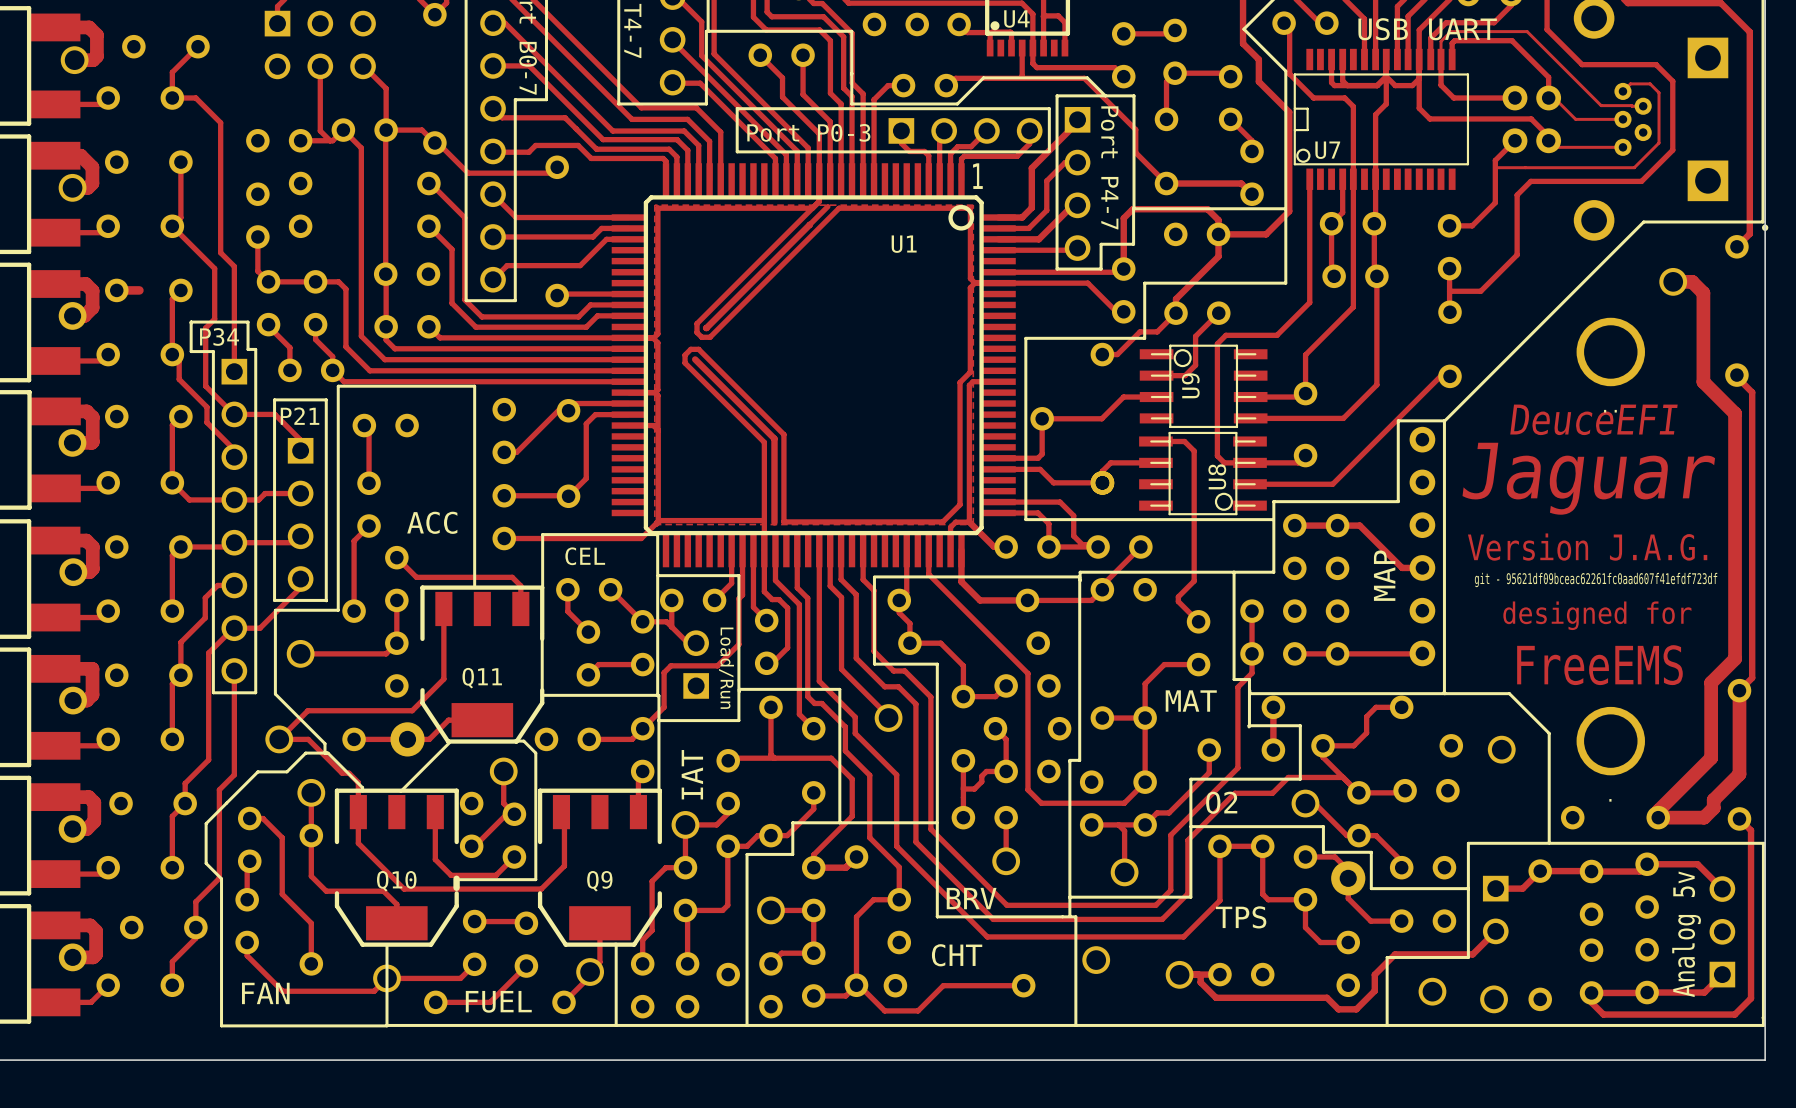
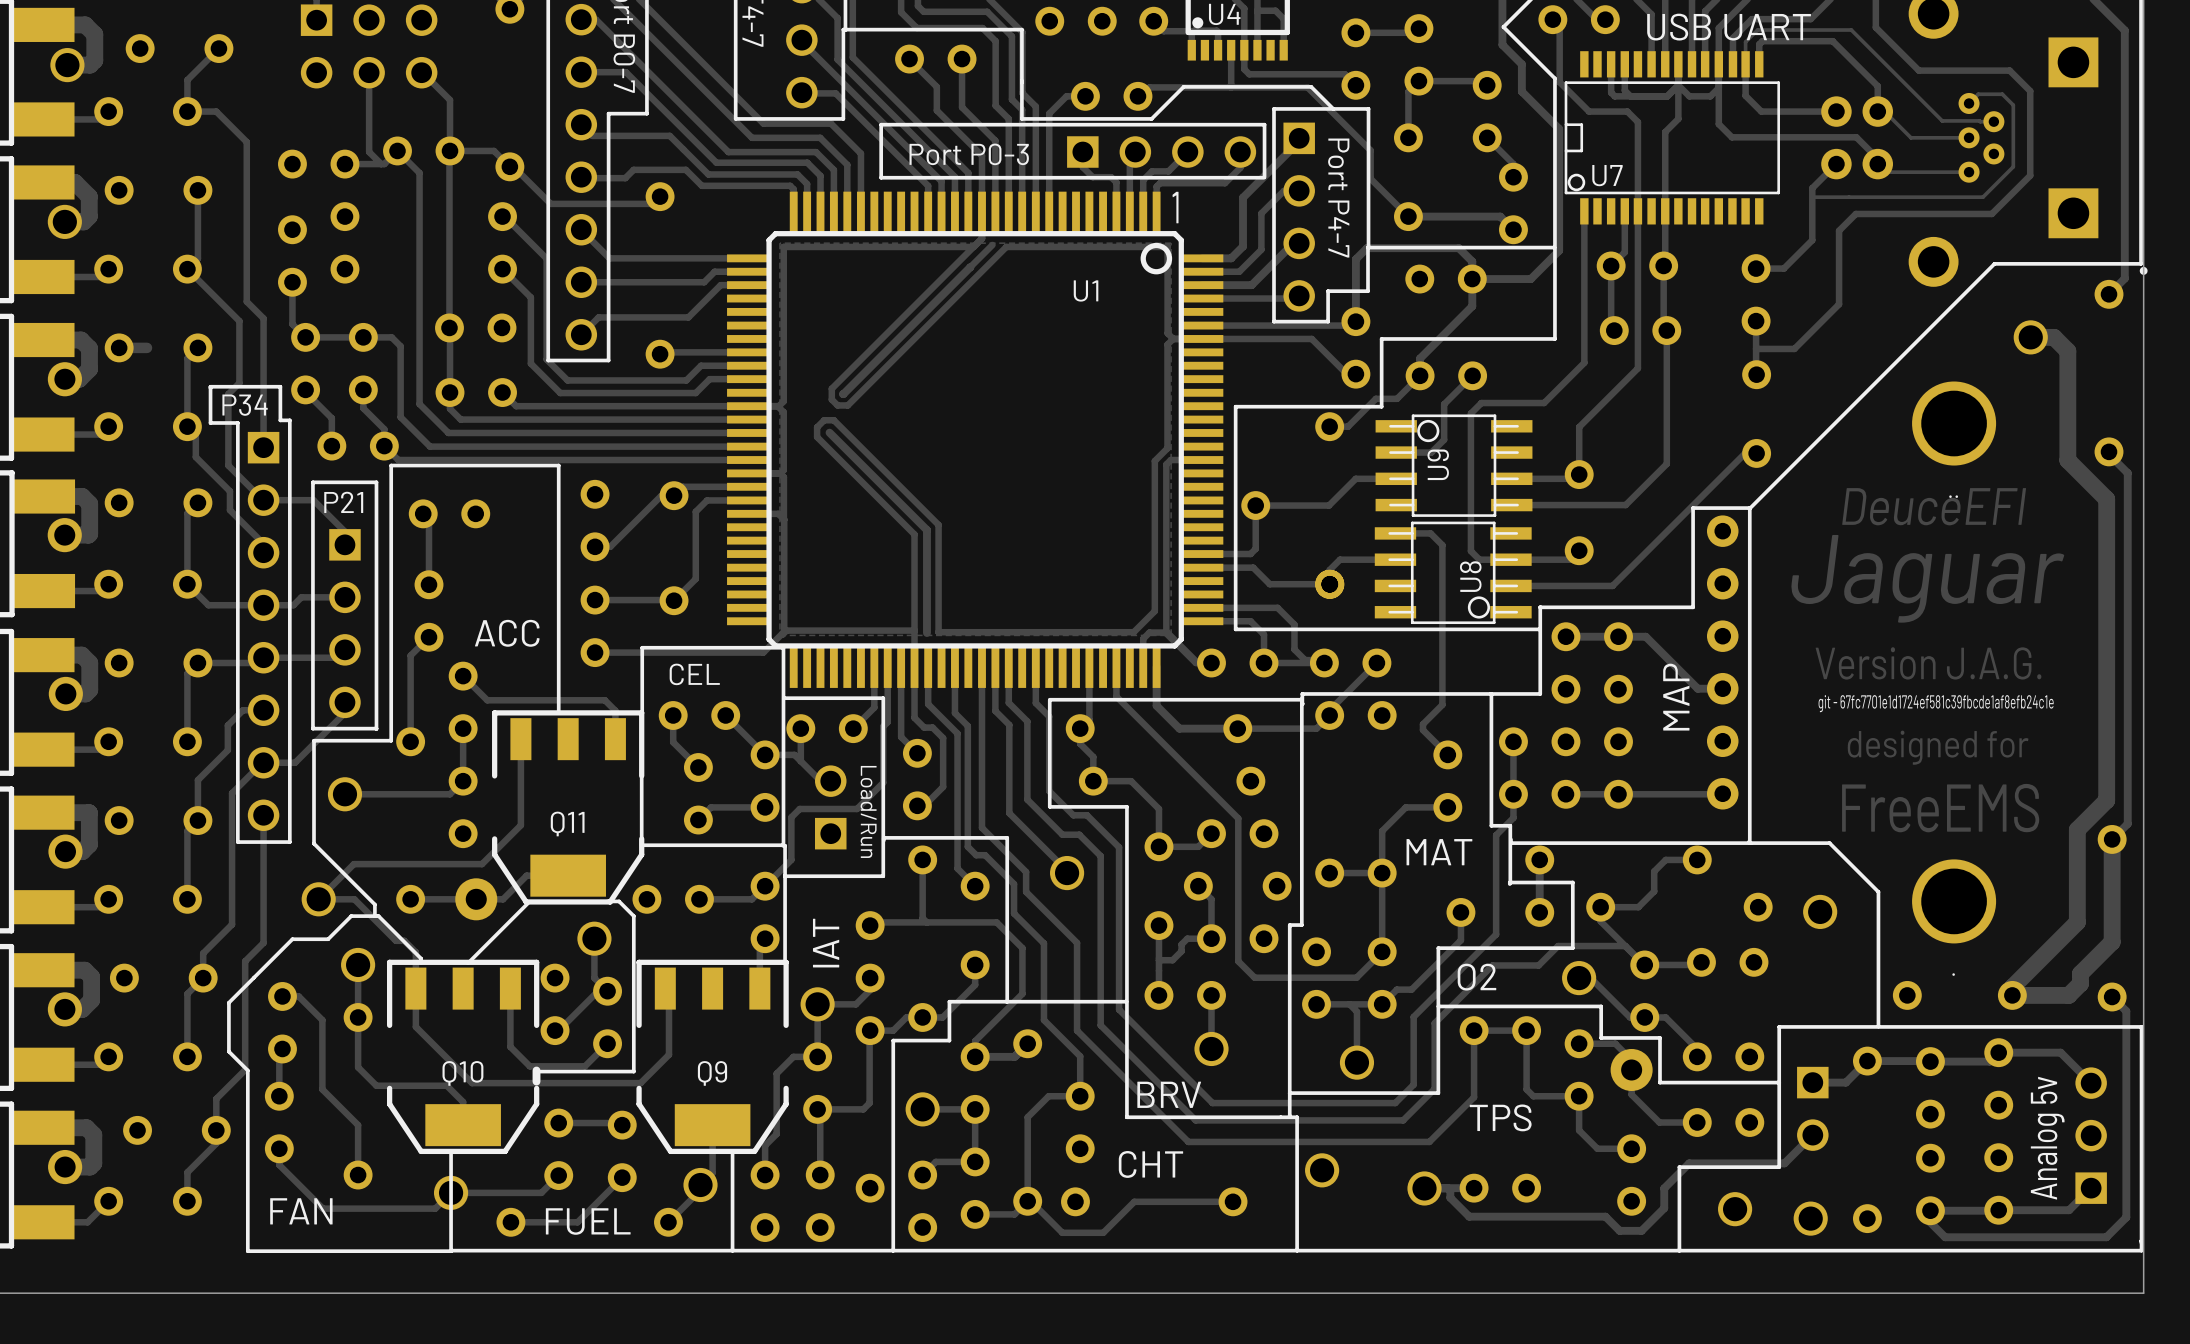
text: git - 95621df09bceac62261fc0aad607f41efdf723df (1596, 580) -> git - 67fc7701e1d1724ef581c39fbcde1af8efb24c1e (1936, 703)

